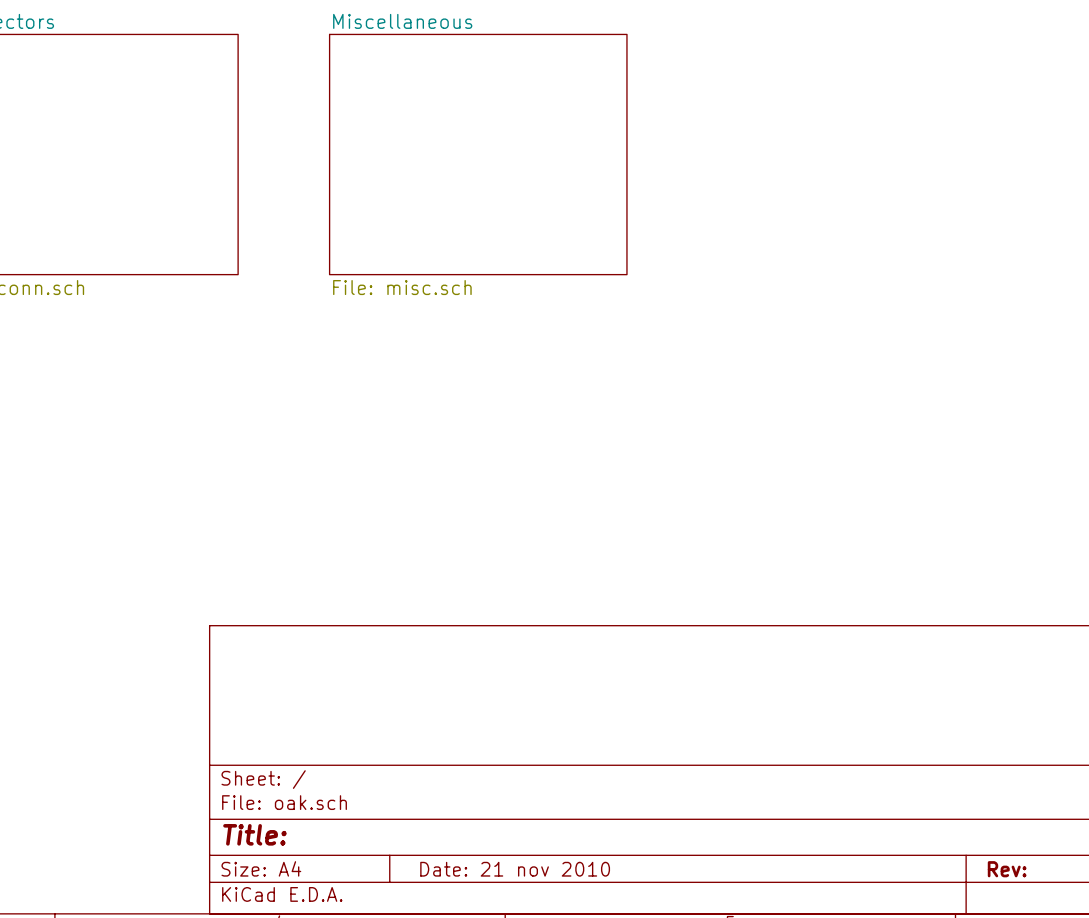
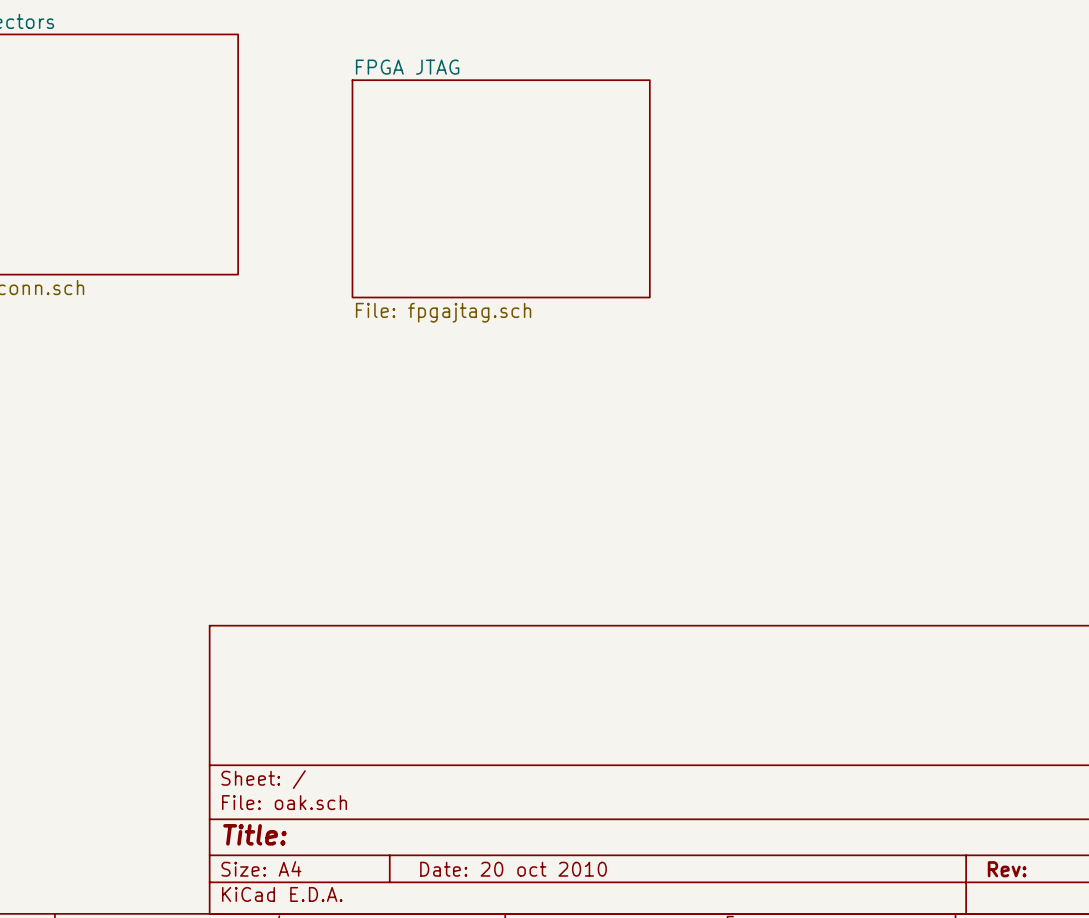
sheet Miscellaneous: File: misc.sch (478, 154) -> none
sheet FPGA JTAG: none -> File: fpgajtag.sch (501, 188)
title block: Date: 21 nov 2010 (515, 869) -> Date: 20 oct 2010 (513, 869)

